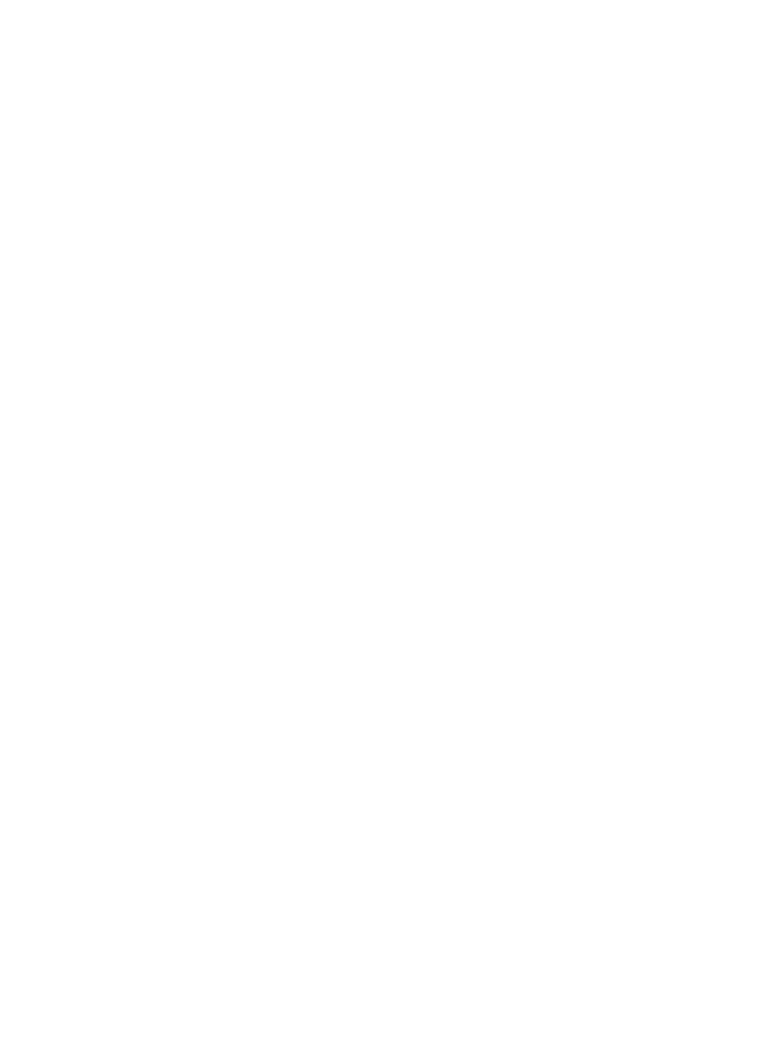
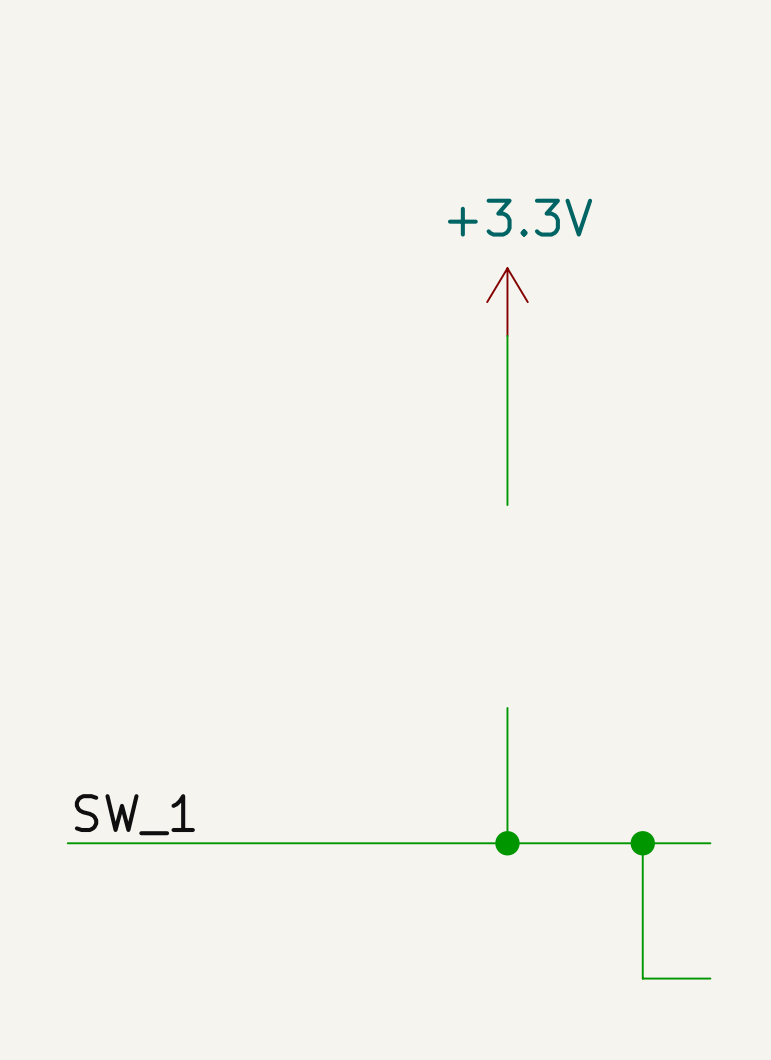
power symbol: none -> +3.3V (507, 302)
wire: none -> (507, 335) (507, 505)
wire: none -> (507, 707) (507, 843)
label: none -> SW_1 (134, 814)
wire: none -> (67, 843) (710, 843)
junction: none -> (507, 843)
wire: none -> (642, 843) (642, 978) (710, 978)
junction: none -> (642, 843)

